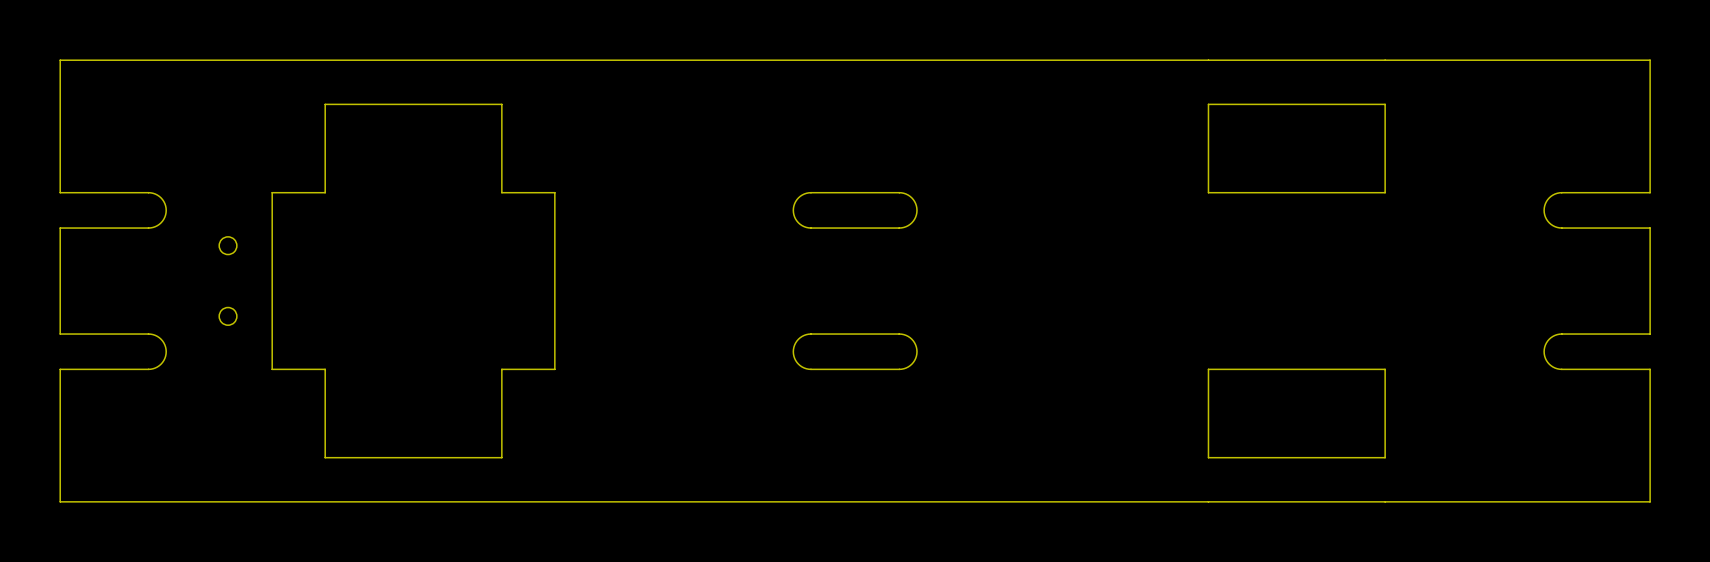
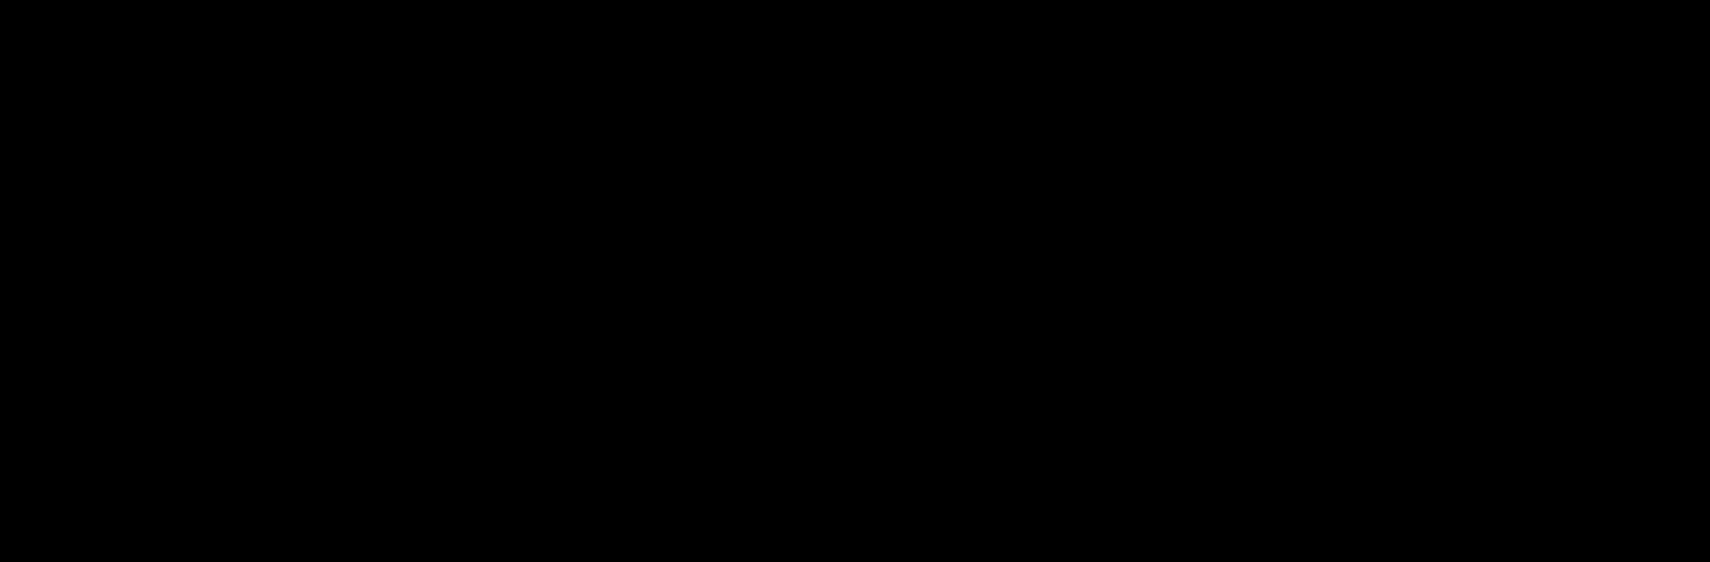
board edge: (60, 60) (1650, 60) (1650, 192) (1559, 192) (1547, 199) (1544, 210) (1547, 221) (1559, 227) (1650, 228) (1650, 334) (1559, 334) (1547, 340) (1544, 351) (1547, 362) (1559, 369) (1650, 369) (1650, 501) (60, 501) (60, 369) (150, 369) (161, 364) (166, 351) (161, 339) (150, 334) (60, 334) (60, 228) (150, 227) (161, 222) (166, 210) (161, 197) (150, 192) (60, 192) (60, 60) -> none
board edge: (325, 104) (501, 104) (501, 192) (554, 192) (554, 369) (501, 369) (501, 457) (325, 457) (325, 369) (272, 369) (272, 192) (325, 192) (325, 104) -> none
board edge: (1208, 104) (1208, 192) (1385, 192) (1385, 104) (1208, 104) -> none
board edge: (811, 192) (903, 193) (914, 201) (916, 214) (911, 222) (901, 227) (806, 227) (796, 221) (793, 208) (798, 197) (811, 192) -> none
round board edge: [218, 236, 238, 255] -> none
round board edge: [218, 307, 238, 326] -> none
board edge: (811, 334) (903, 334) (914, 342) (916, 356) (911, 364) (901, 369) (806, 368) (796, 362) (793, 349) (798, 339) (811, 334) -> none
board edge: (1208, 369) (1385, 369) (1385, 457) (1208, 457) (1208, 369) -> none

